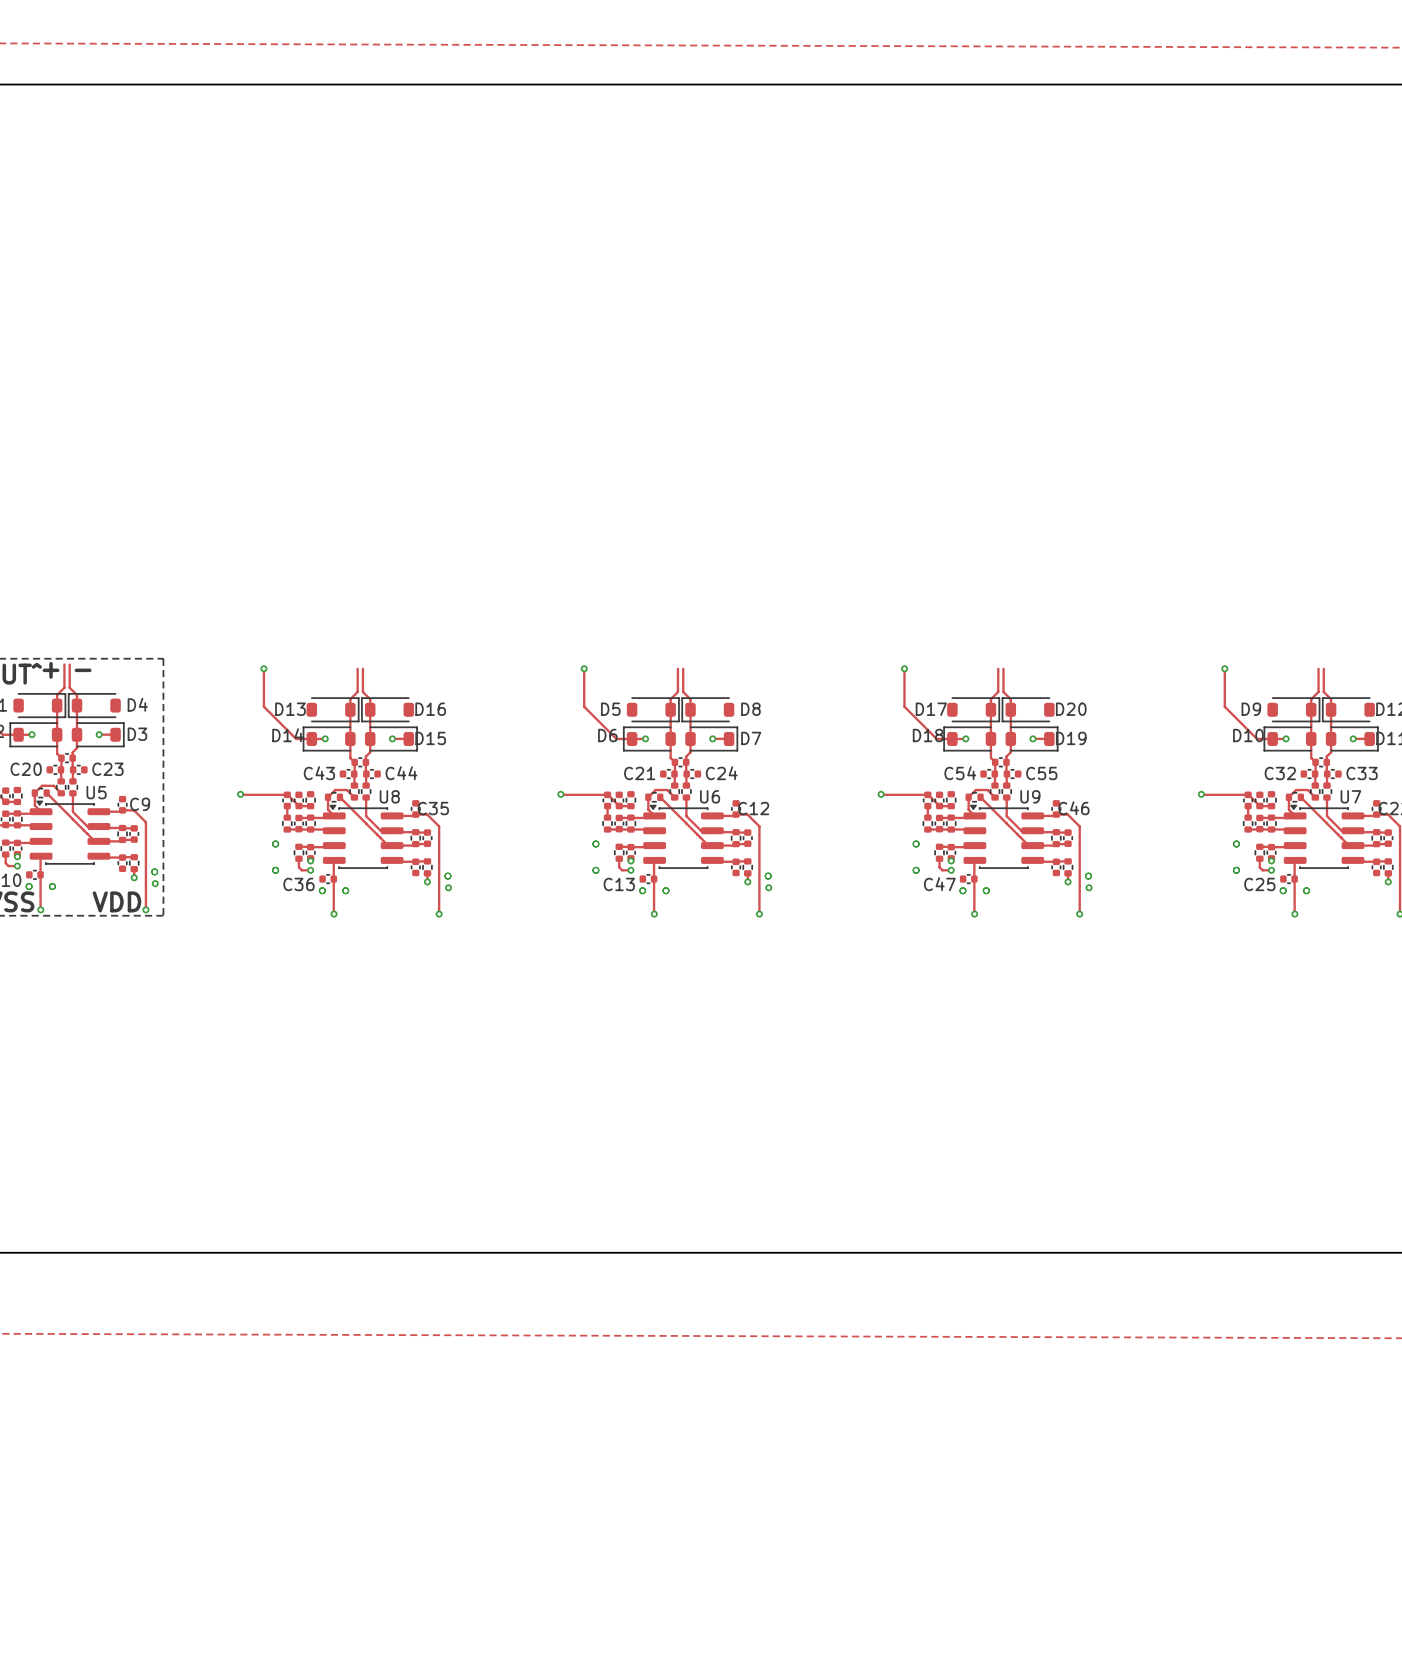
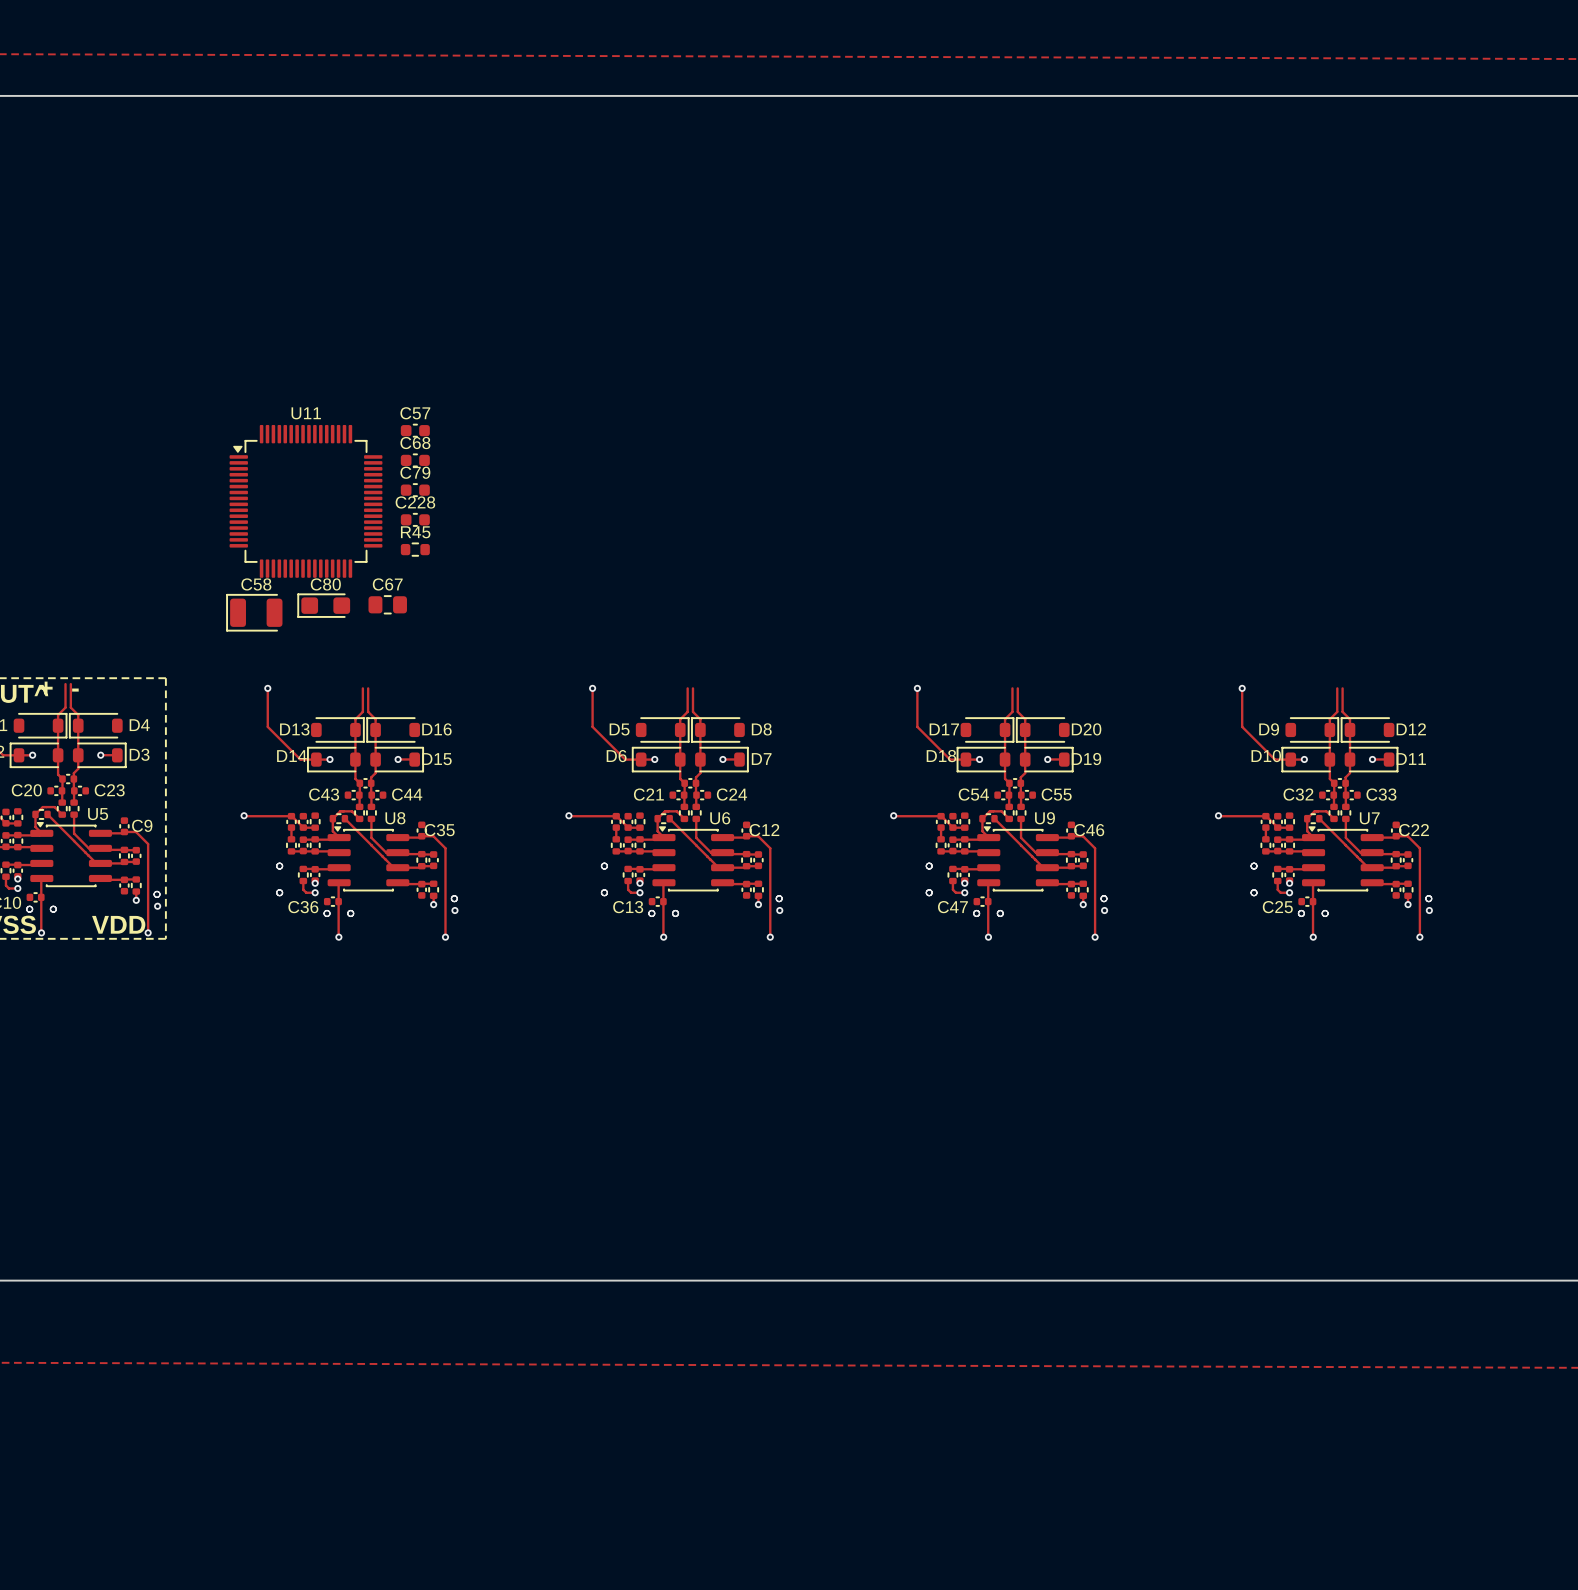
C57: none -> (415, 430)
C68: none -> (415, 460)
C79: none -> (415, 490)
U11: none -> (305, 501)
C228: none -> (415, 519)
R45: none -> (415, 549)
C67: none -> (387, 604)
C80: none -> (323, 605)
C58: none -> (254, 612)

